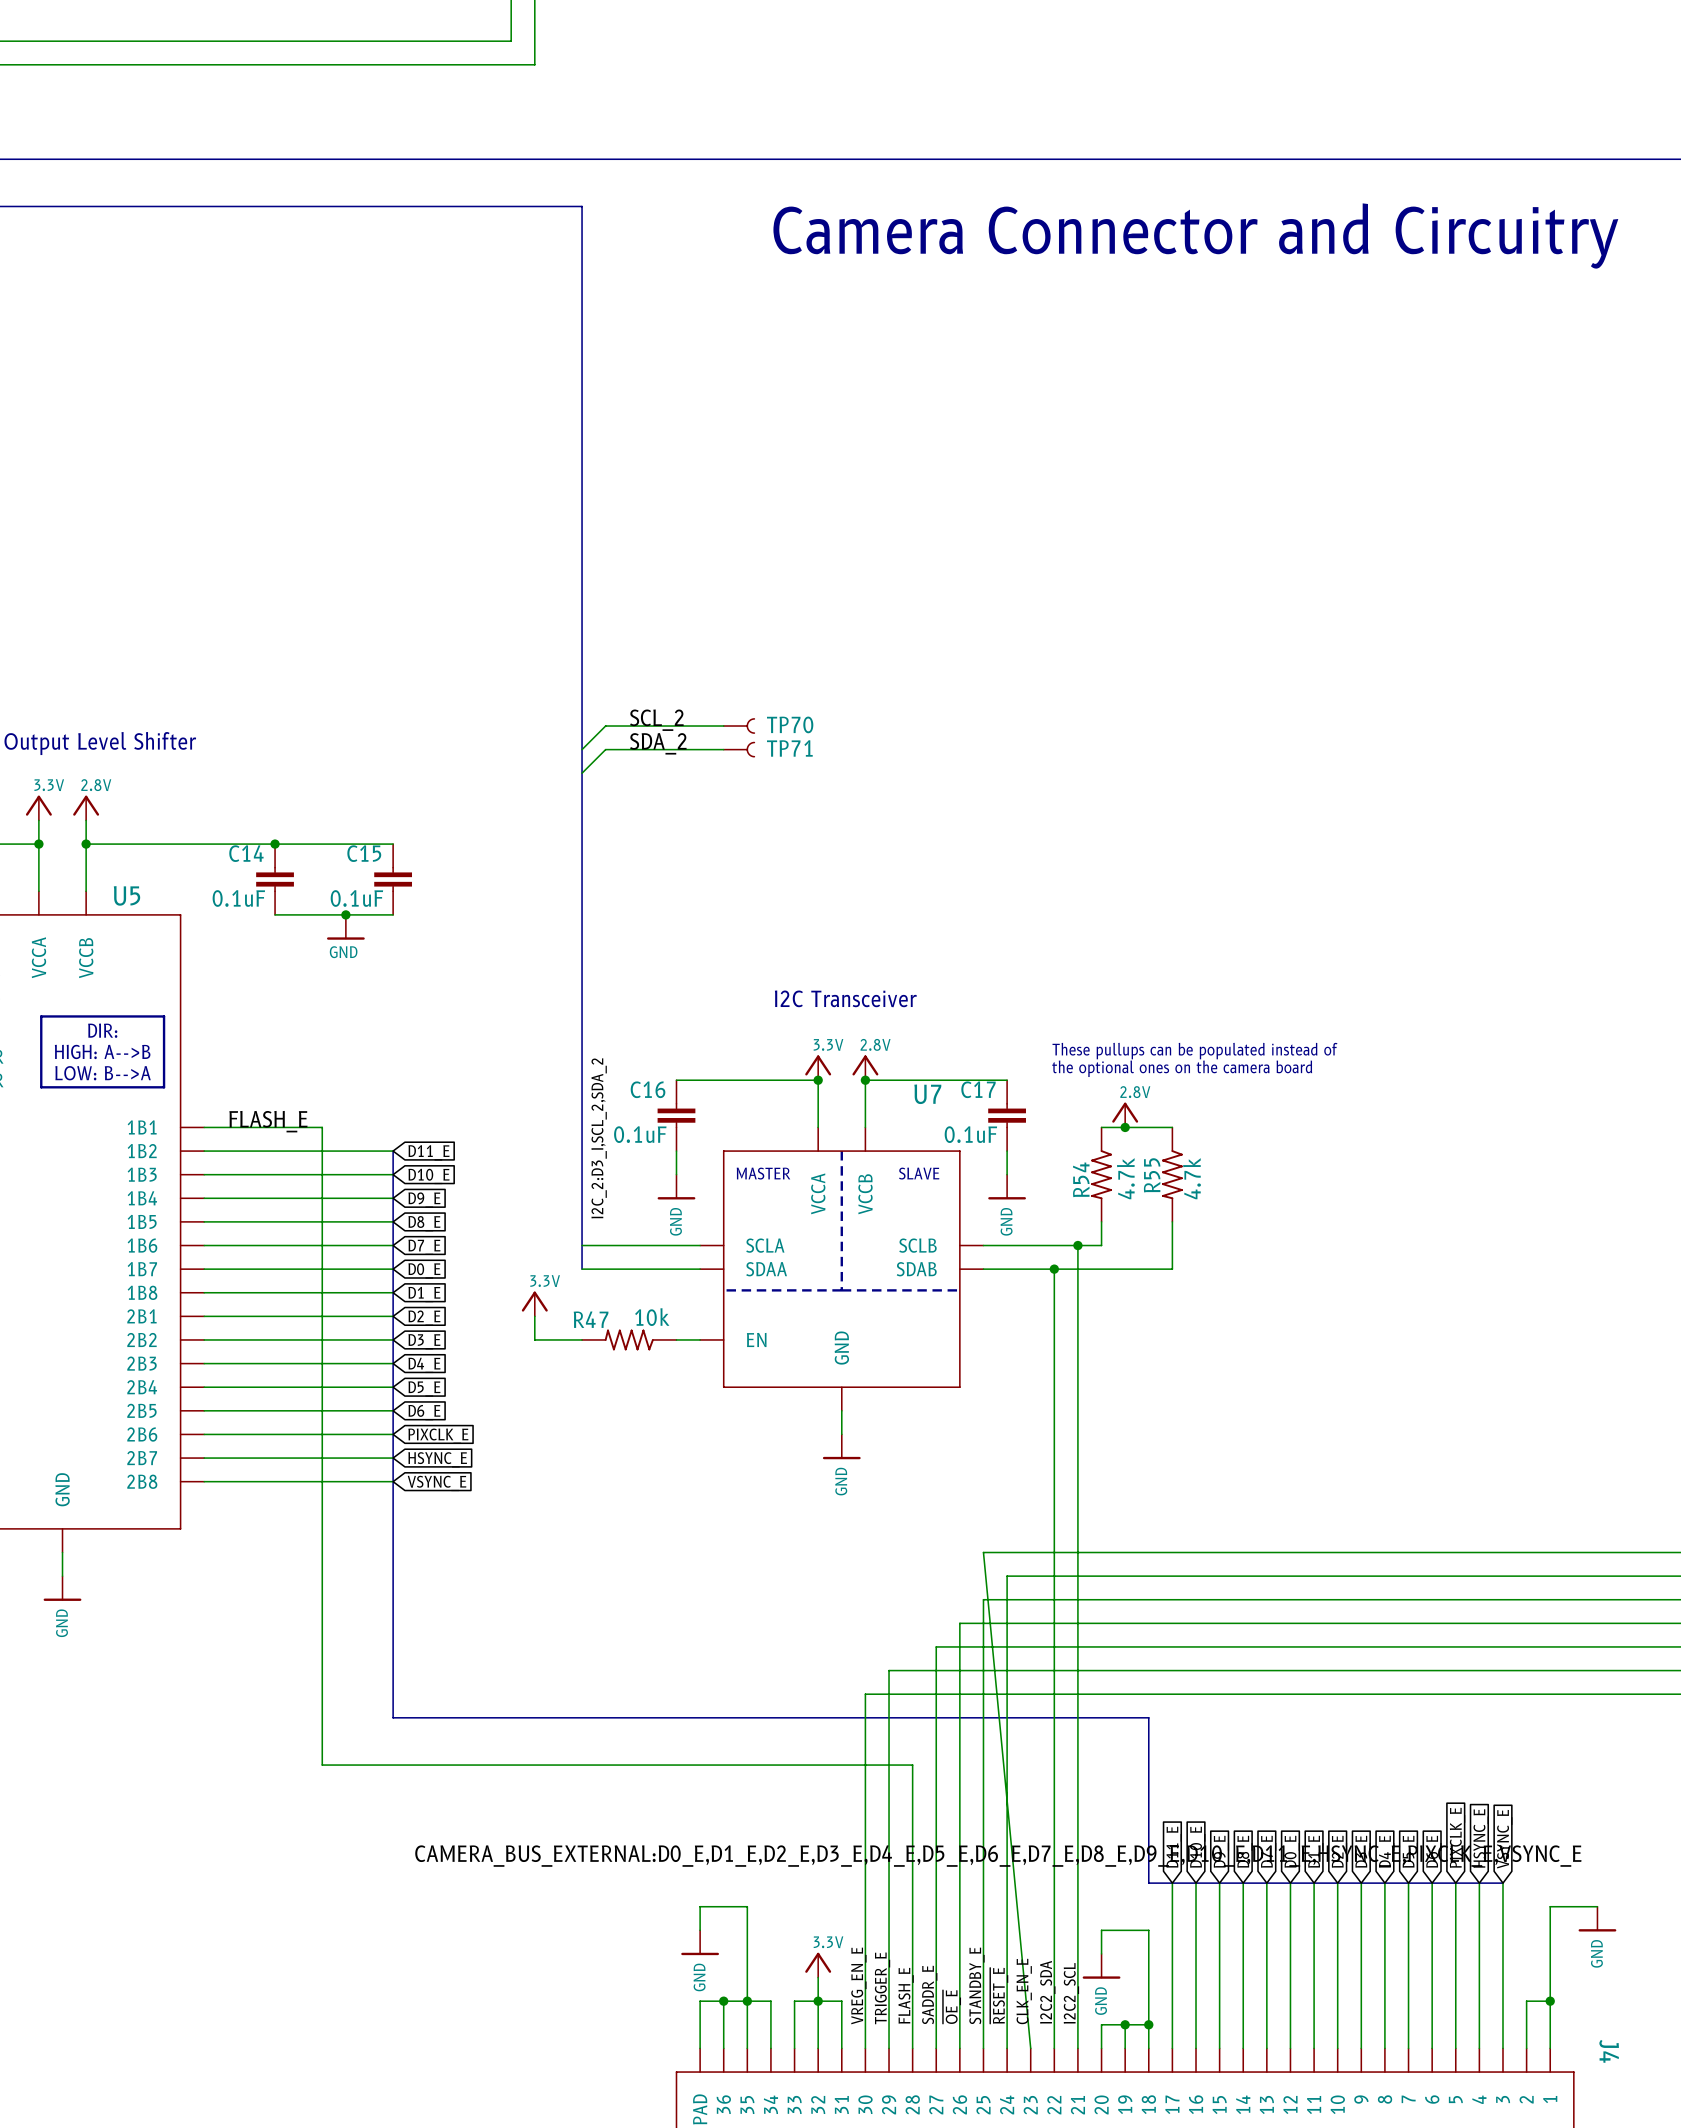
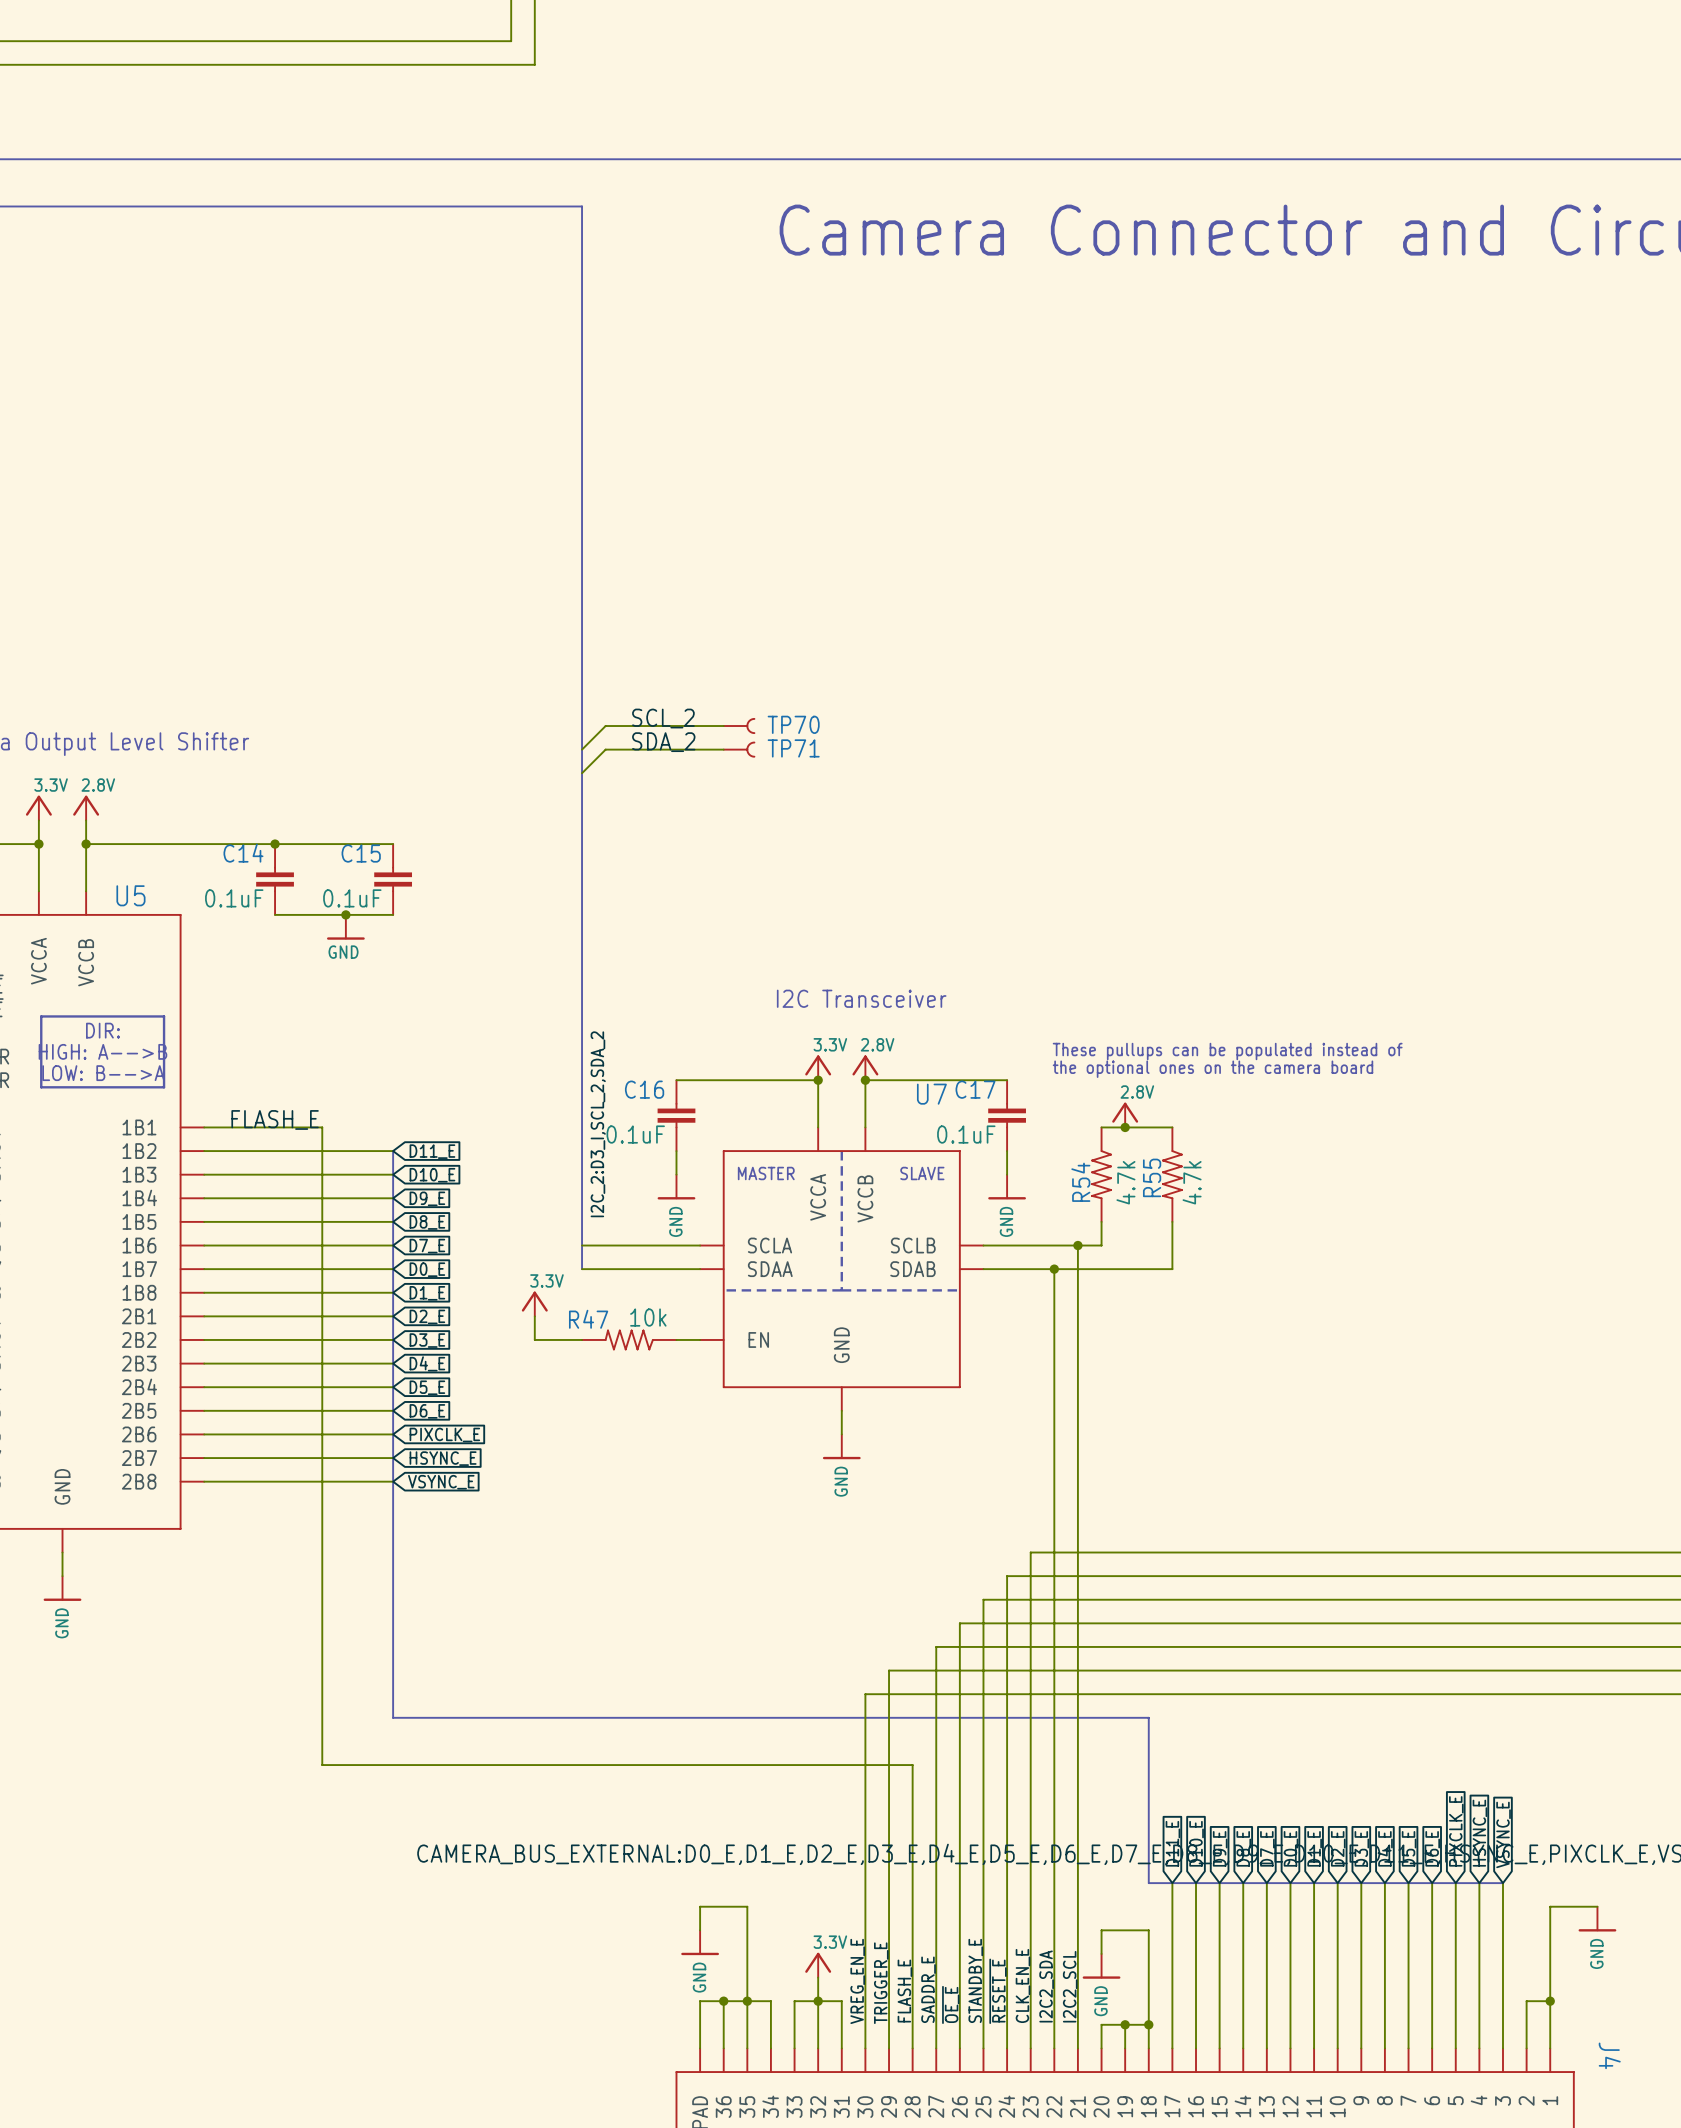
wire: (1030, 1552) (983, 1552) (1030, 2048) -> (1030, 1552) (1030, 2048)

